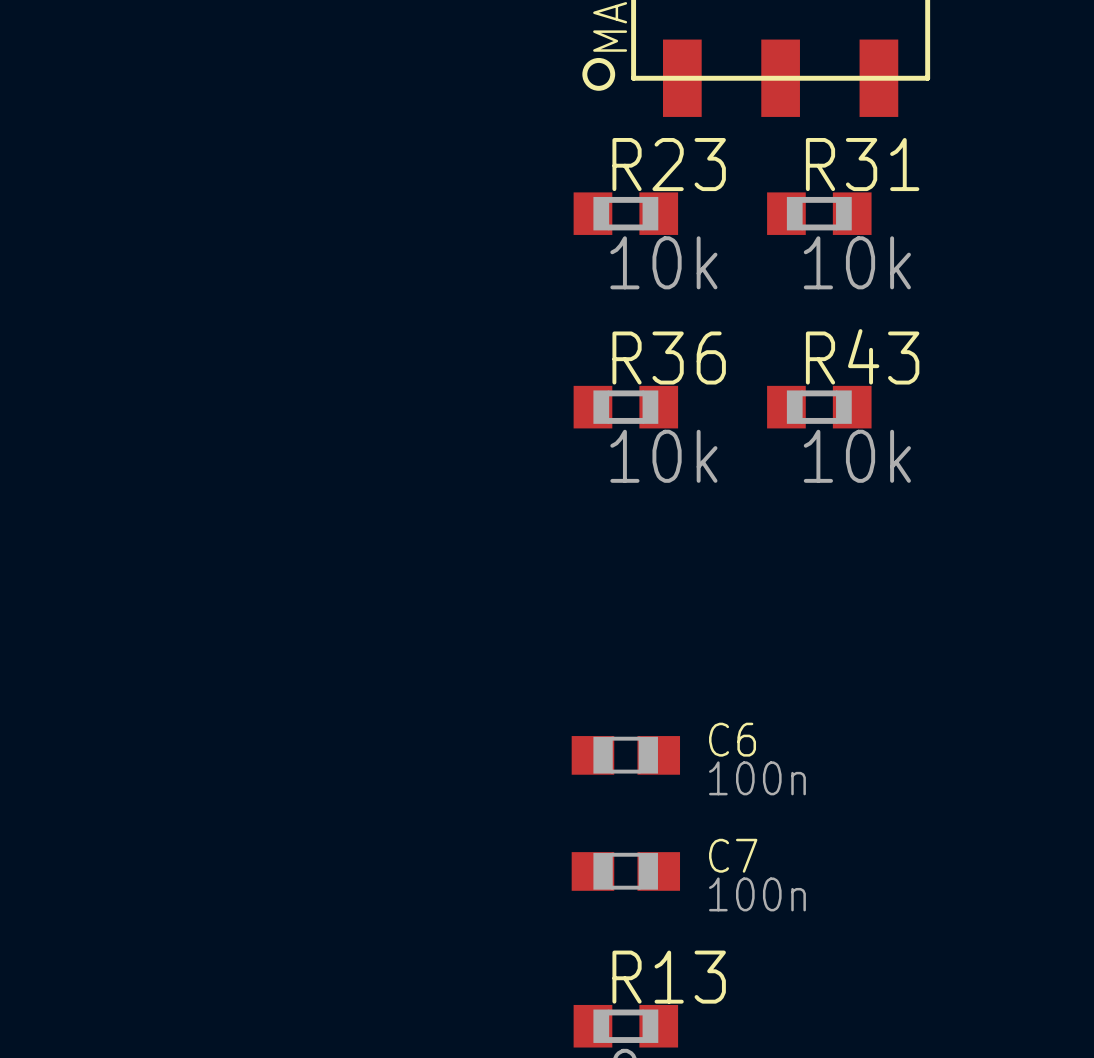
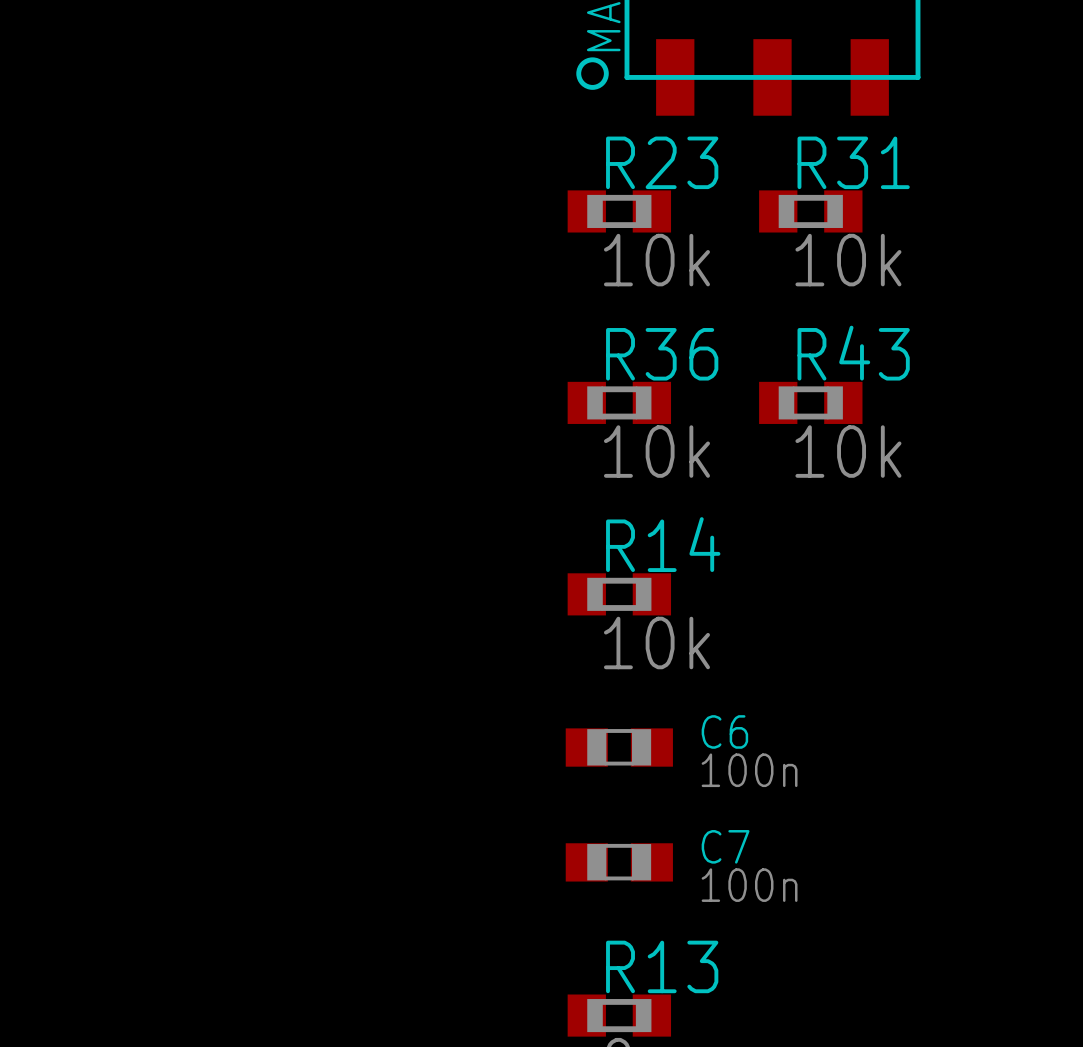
R14: none -> 10k (619, 594)

